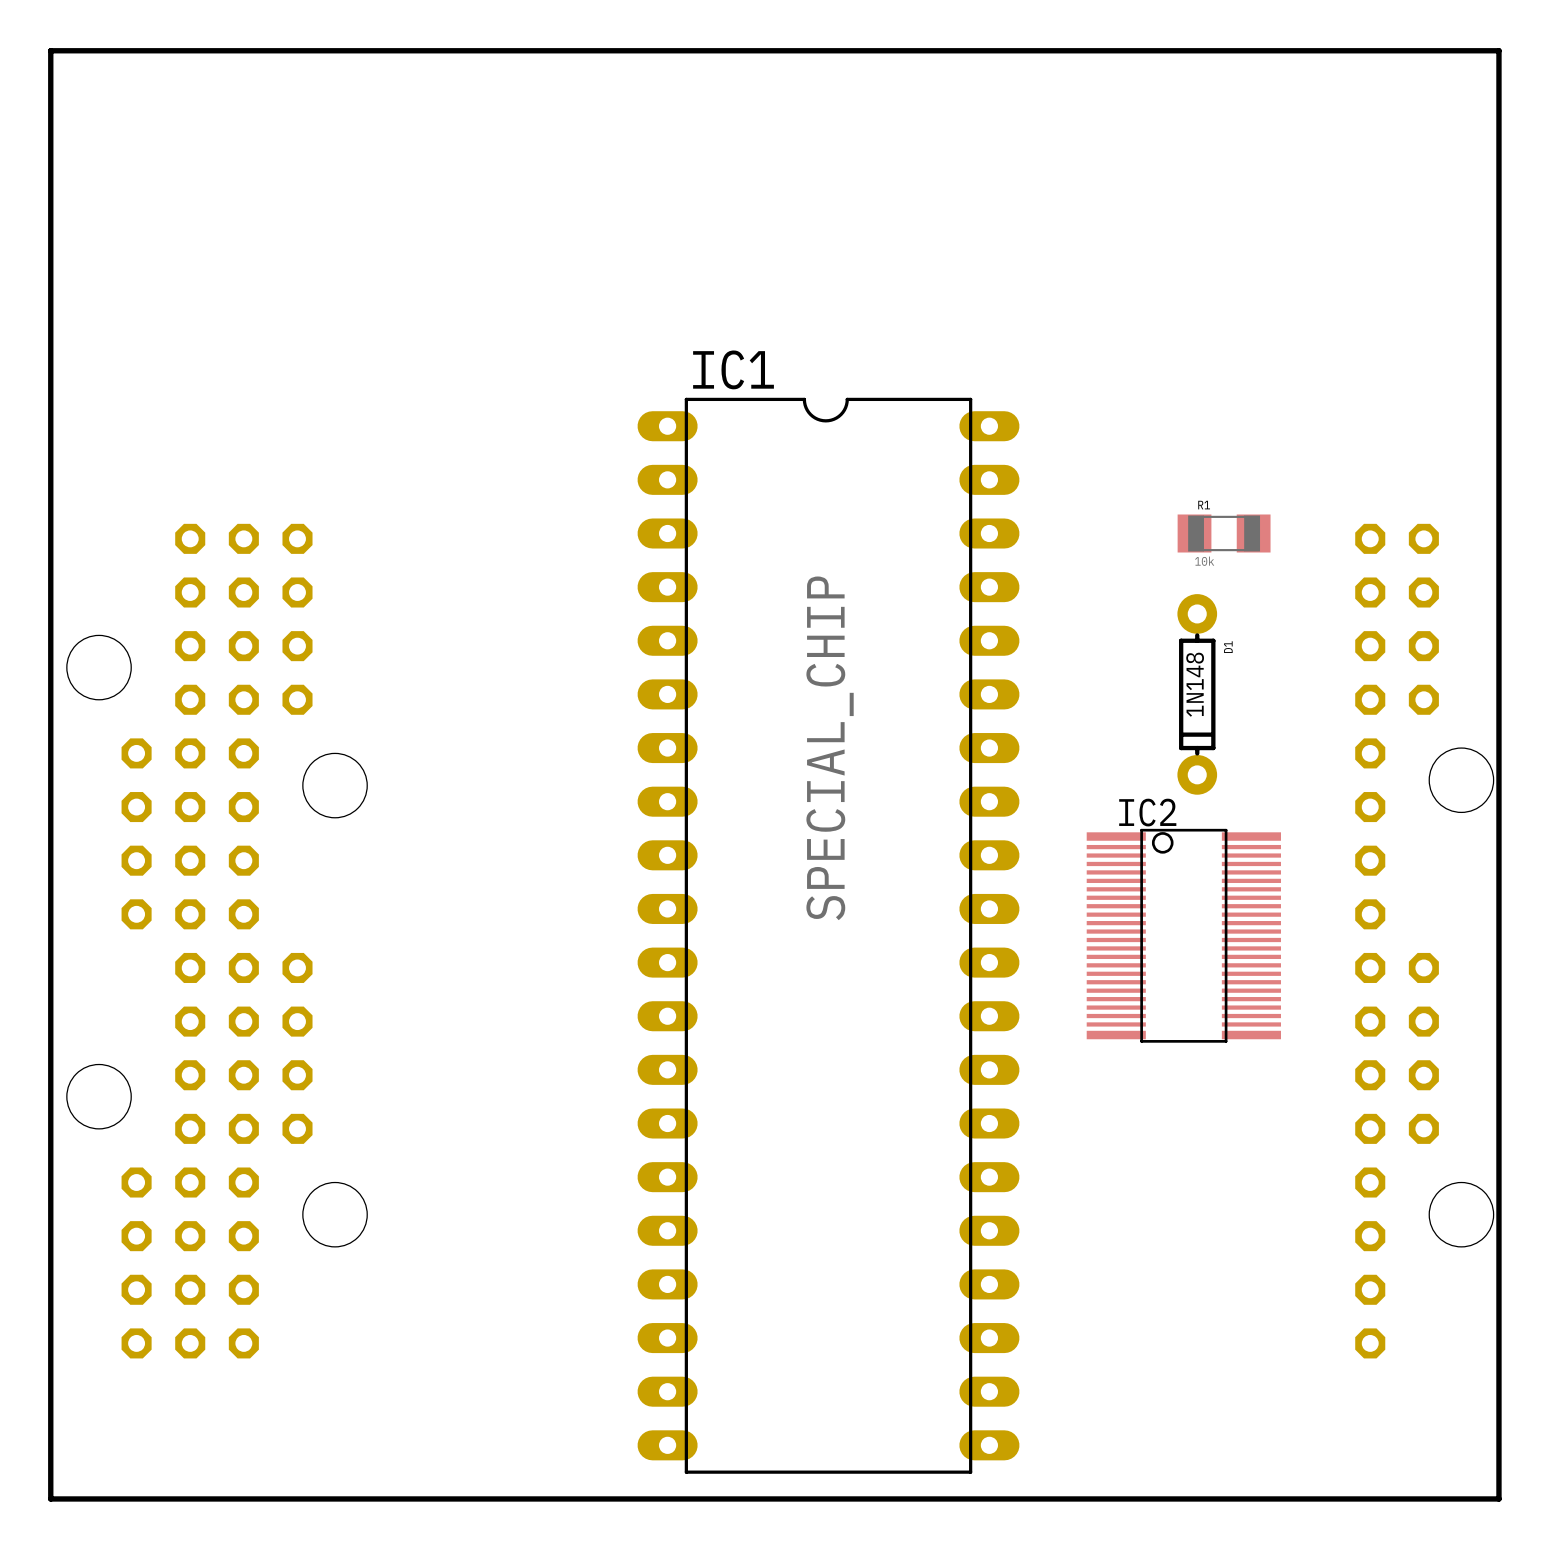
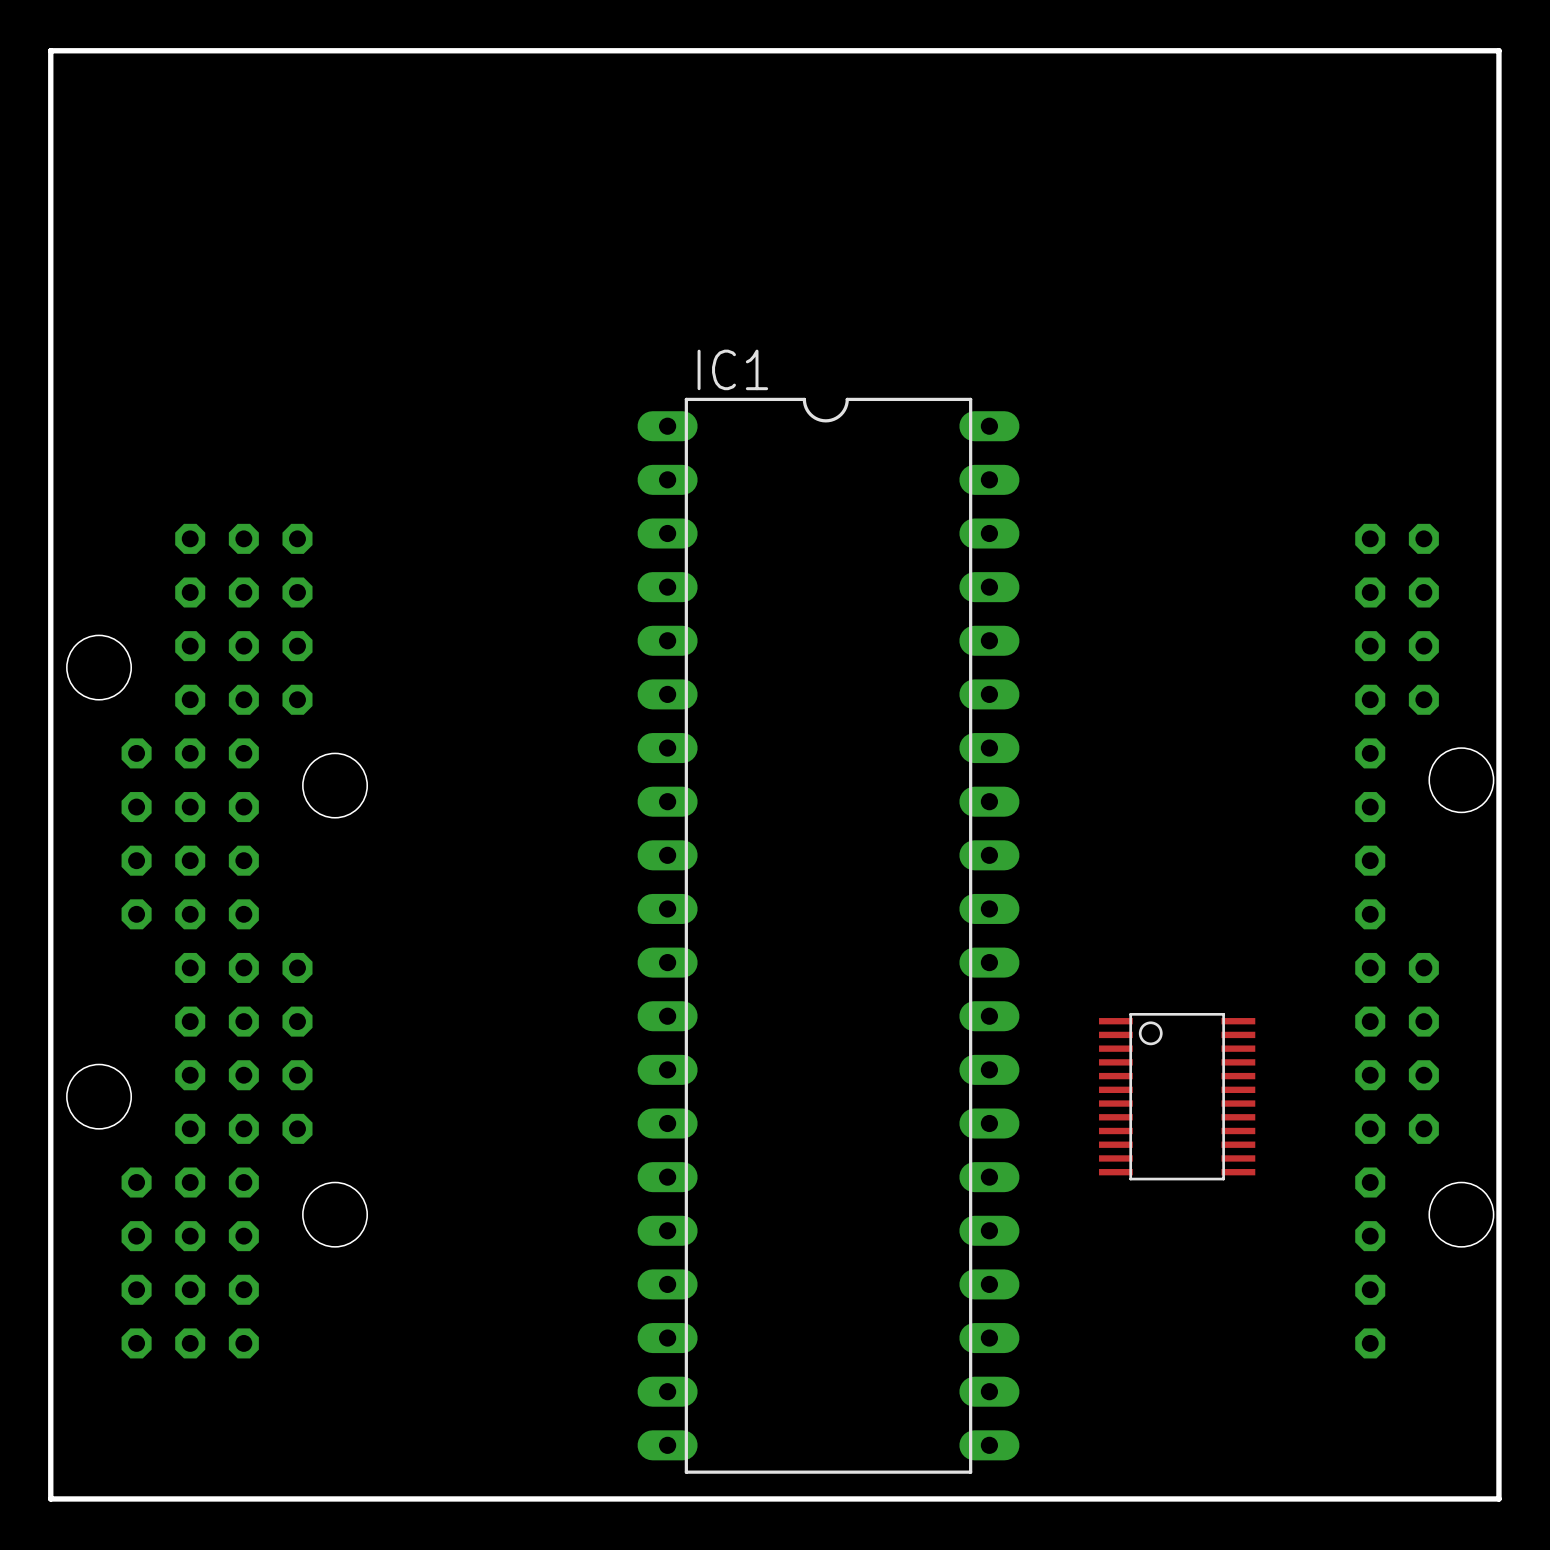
R1: 10k (1224, 533) -> none
D1: 1N148 (1197, 694) -> none
IC1 value: SPECIAL_CHIP (830, 748) -> none
IC2: (1183, 935) -> none
part: none -> (1177, 1096)

